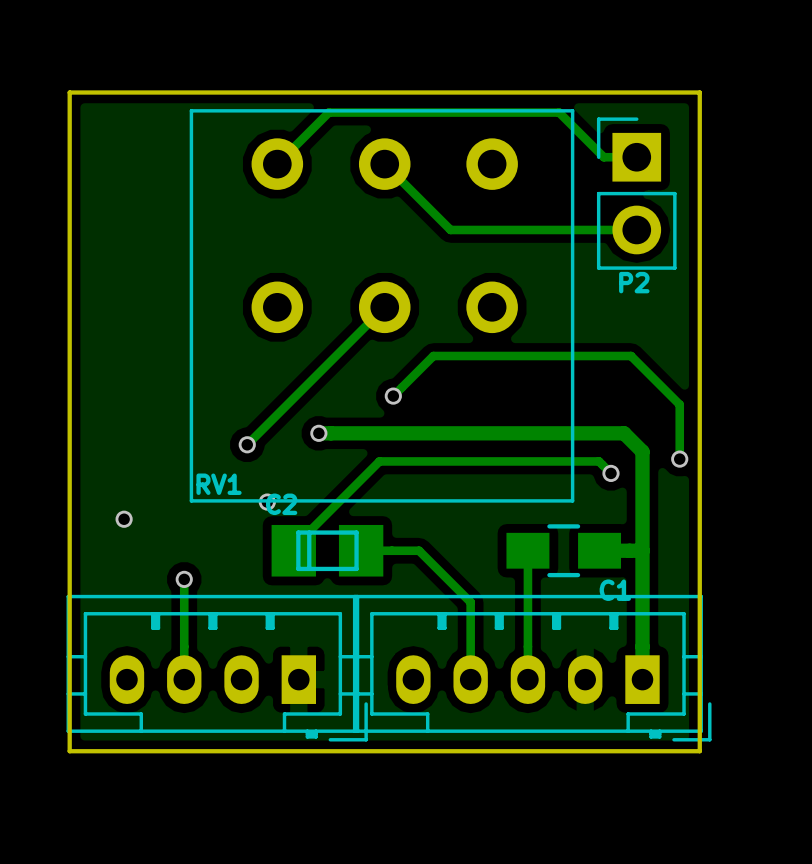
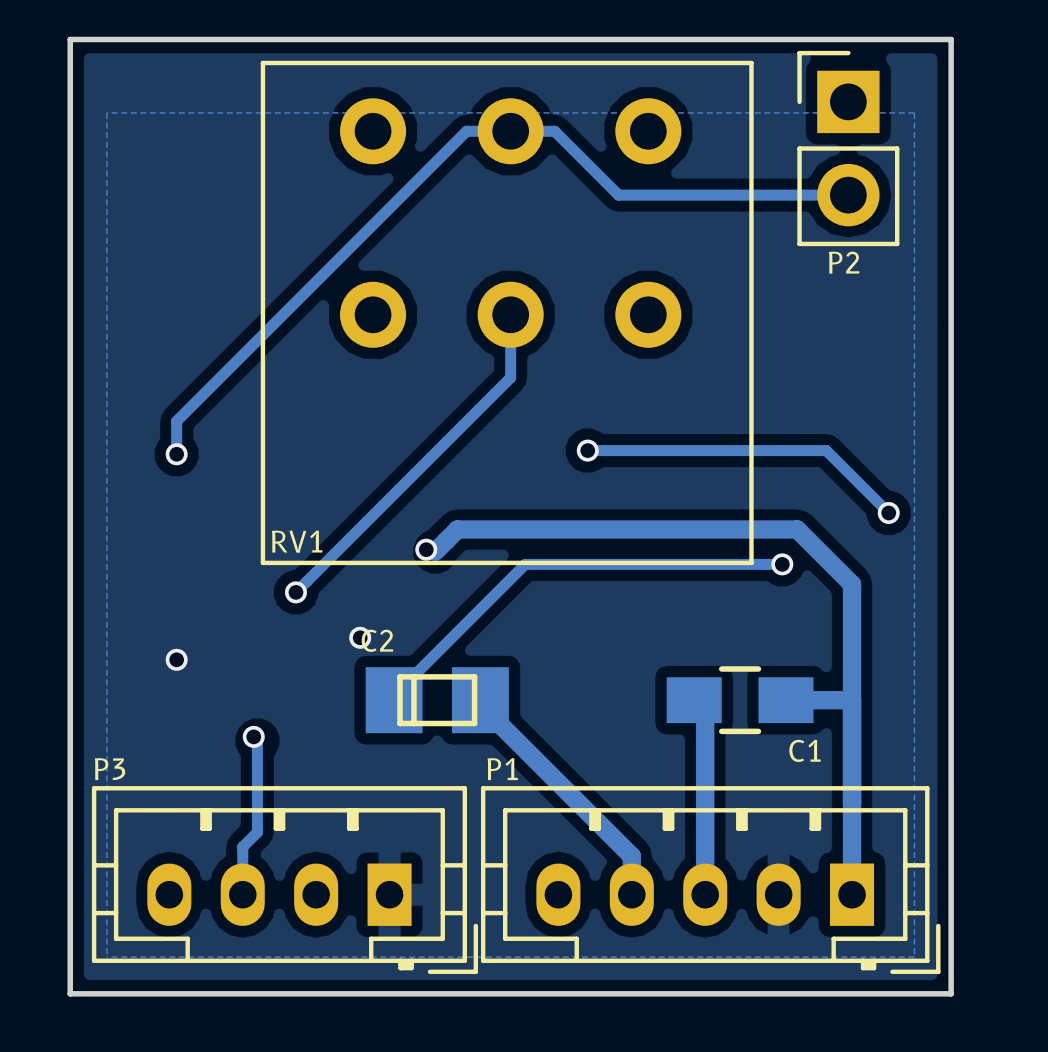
board edge: (699, 92) (699, 751) (69, 751) (69, 92) (699, 92) -> (951, 39) (951, 993) (70, 993) (70, 39) (951, 39)
track: none -> (848, 195) (618, 195) (554, 131) (466, 131) (176, 421) (176, 454)
track: (636, 157) (603, 157) (559, 112) (328, 112) (277, 164) -> none
track: (384, 164) (450, 229) (636, 229) -> none
P2 position: (636, 193) -> (848, 148)
track: none -> (510, 314) (510, 377) (295, 592)
RV1 position: (382, 305) -> (507, 312)
track: (384, 307) (247, 444) -> none
track: (444, 356) (433, 356) (393, 396) -> none
via: none -> (176, 454)
via position: (393, 396) -> (587, 450)
track: (679, 404) (679, 459) -> none
via: none -> (888, 512)
track: (624, 433) (318, 433) -> (817, 549) (797, 529) (457, 529) (435, 551)
via position: (247, 444) -> (295, 592)
track: (642, 451) (642, 679) -> (841, 573) (852, 584) (852, 894)
via: (679, 459) -> none
track: (379, 461) (599, 461) (610, 473) -> (503, 585) (525, 564) (782, 564)
via position: (610, 473) -> (782, 564)
track: (361, 550) (419, 550) (470, 602) (470, 679) -> (480, 700) (480, 704) (631, 856) (631, 894)
track: (527, 550) (527, 679) -> (694, 700) (705, 711) (705, 894)
track: (184, 579) (184, 679) -> none
track: none -> (257, 740) (257, 832) (242, 847) (242, 894)
P3 name: none -> P3 (109, 769)
P1 name: none -> P1 (502, 769)
P3 position: (217, 668) -> (284, 880)
P1 position: (532, 668) -> (710, 880)

